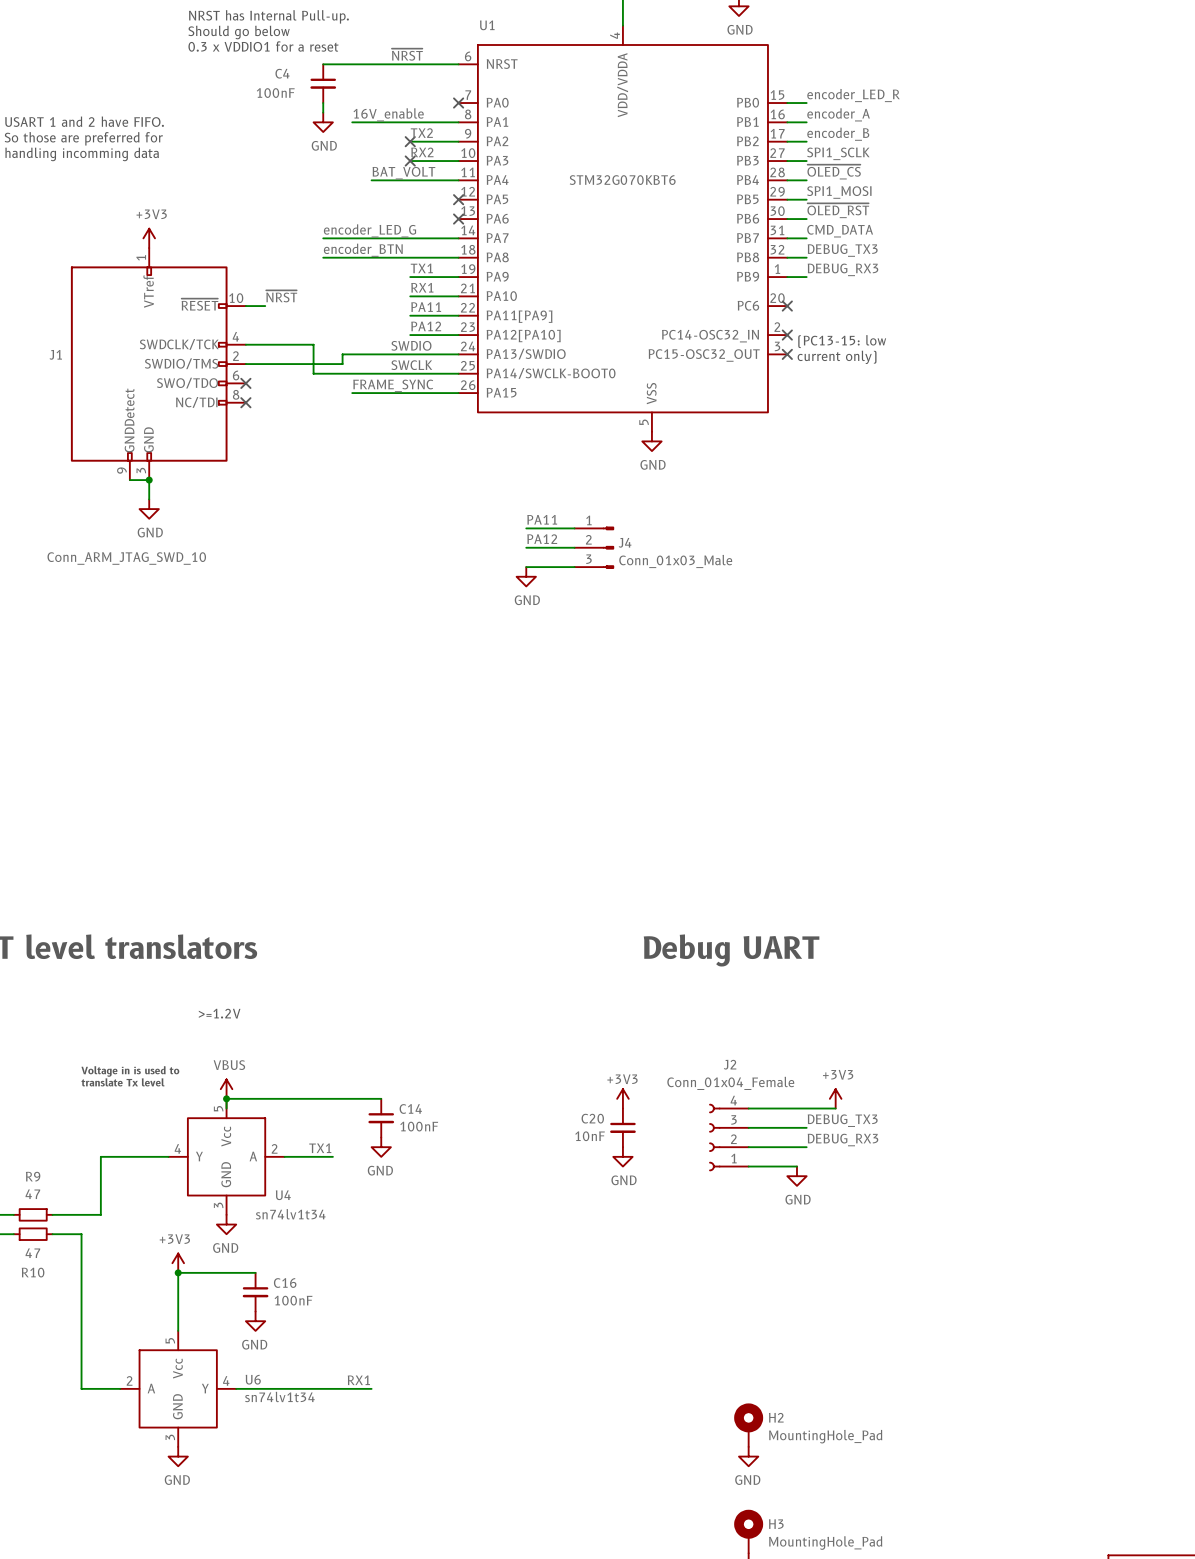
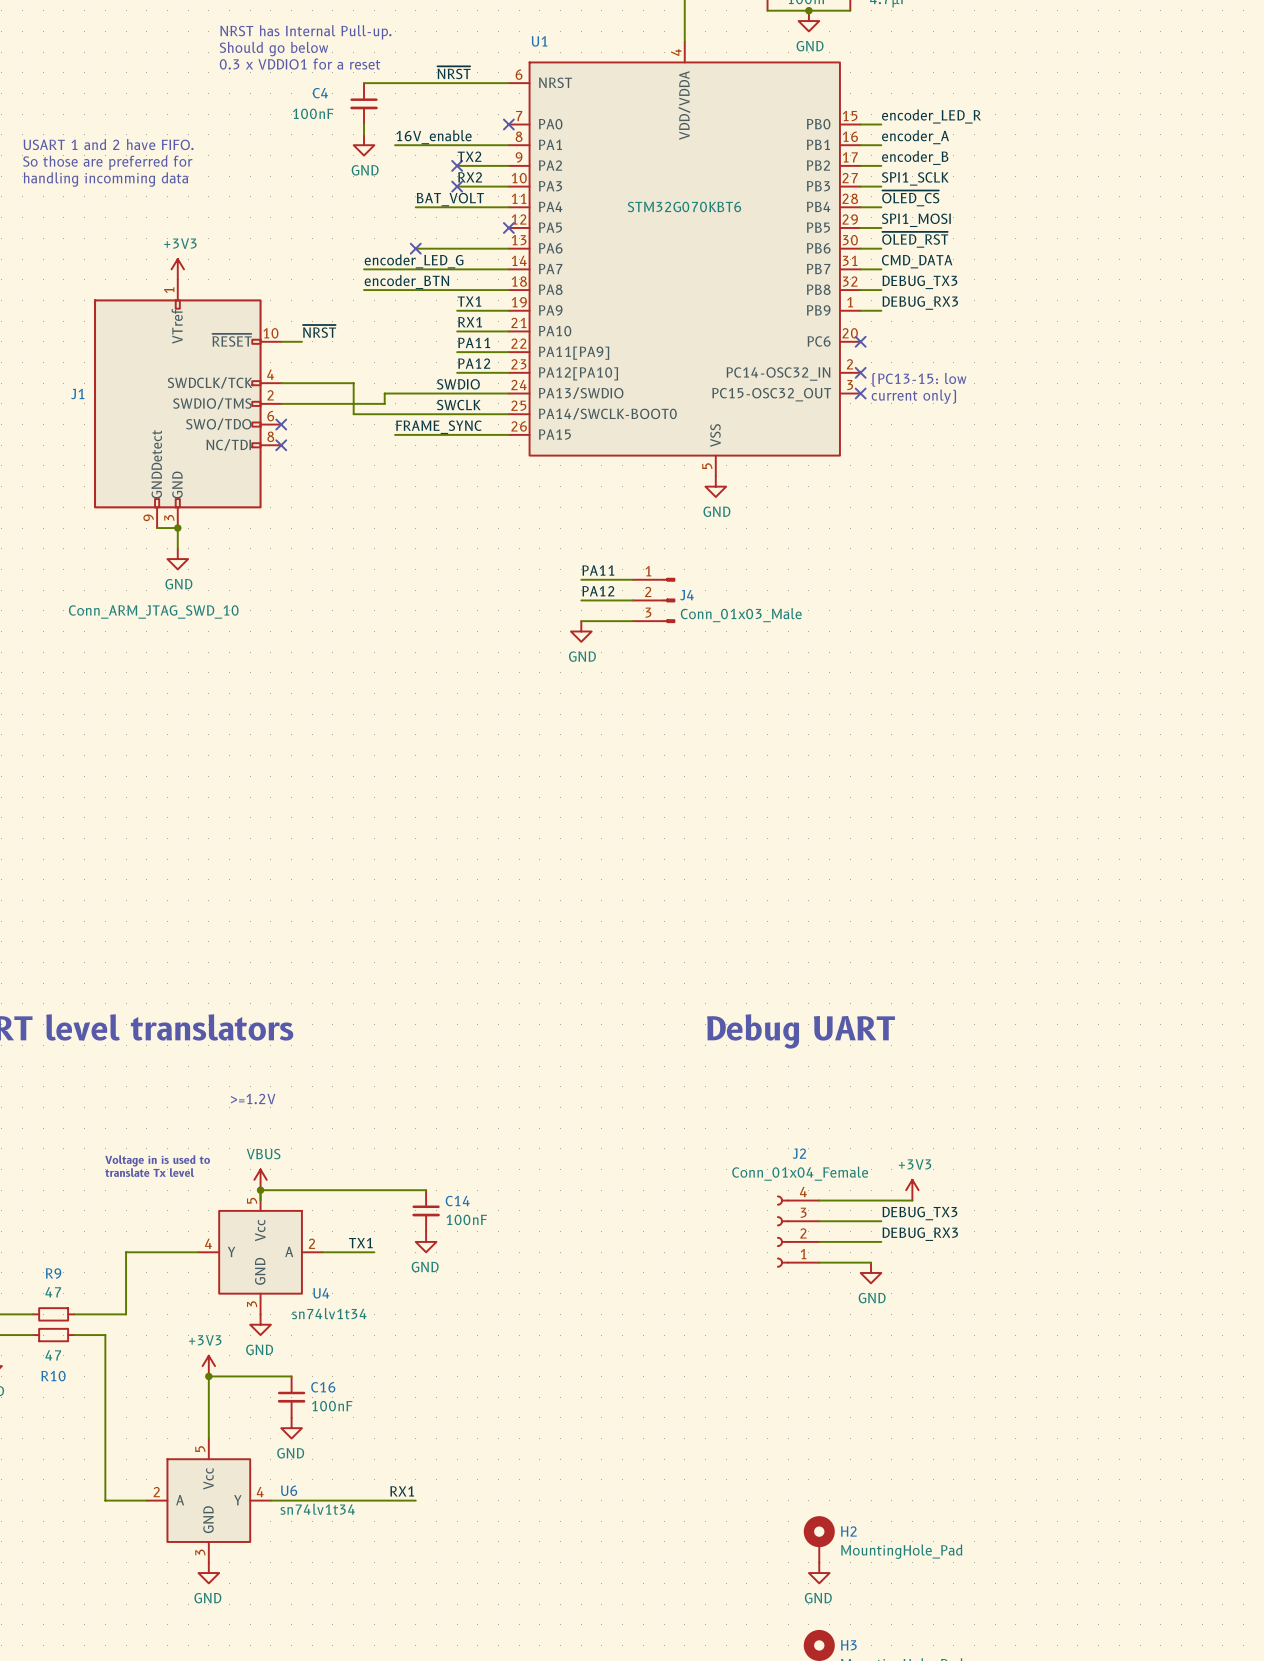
wire: none -> (415, 248) (508, 248)
no-connect mark: none -> (415, 248)
no-connect mark: (458, 219) -> none
power symbol: +3V3 (622, 1098) -> none
C20: 10nF (622, 1127) -> none
power symbol: GND (622, 1156) -> none

